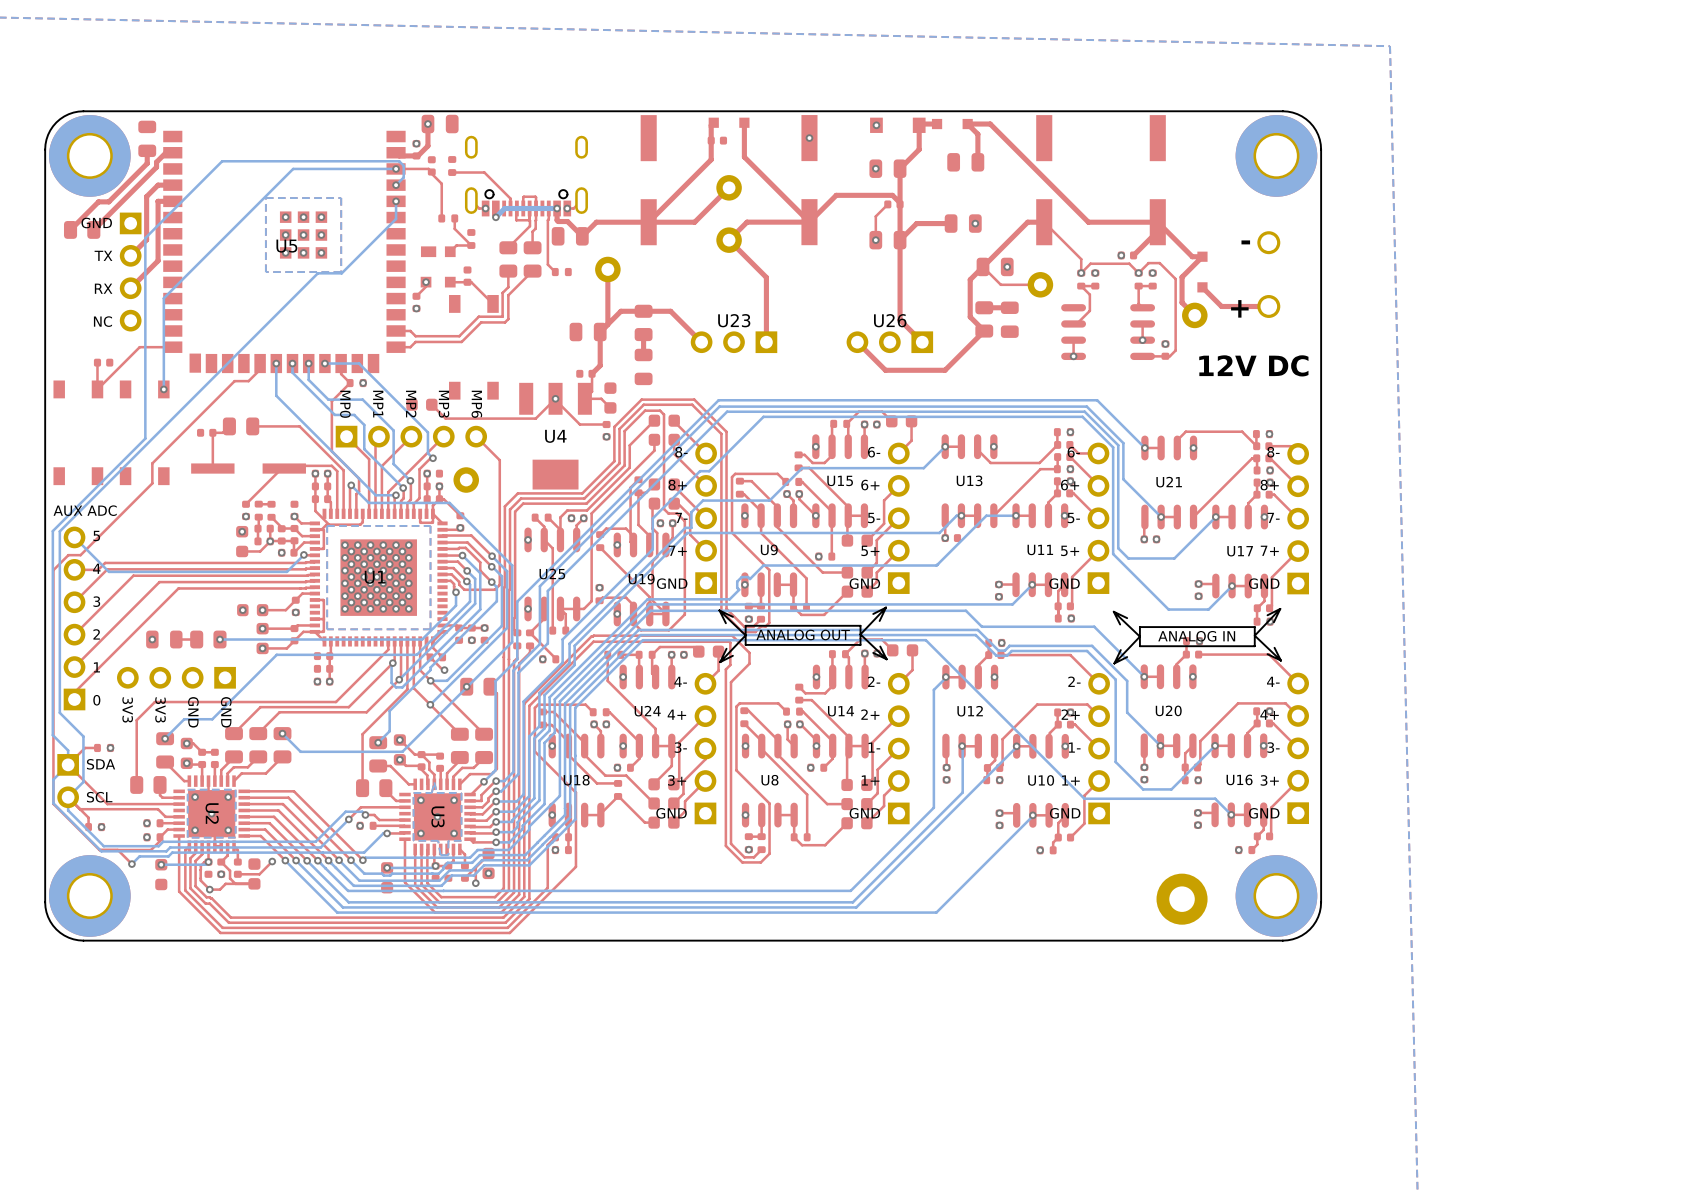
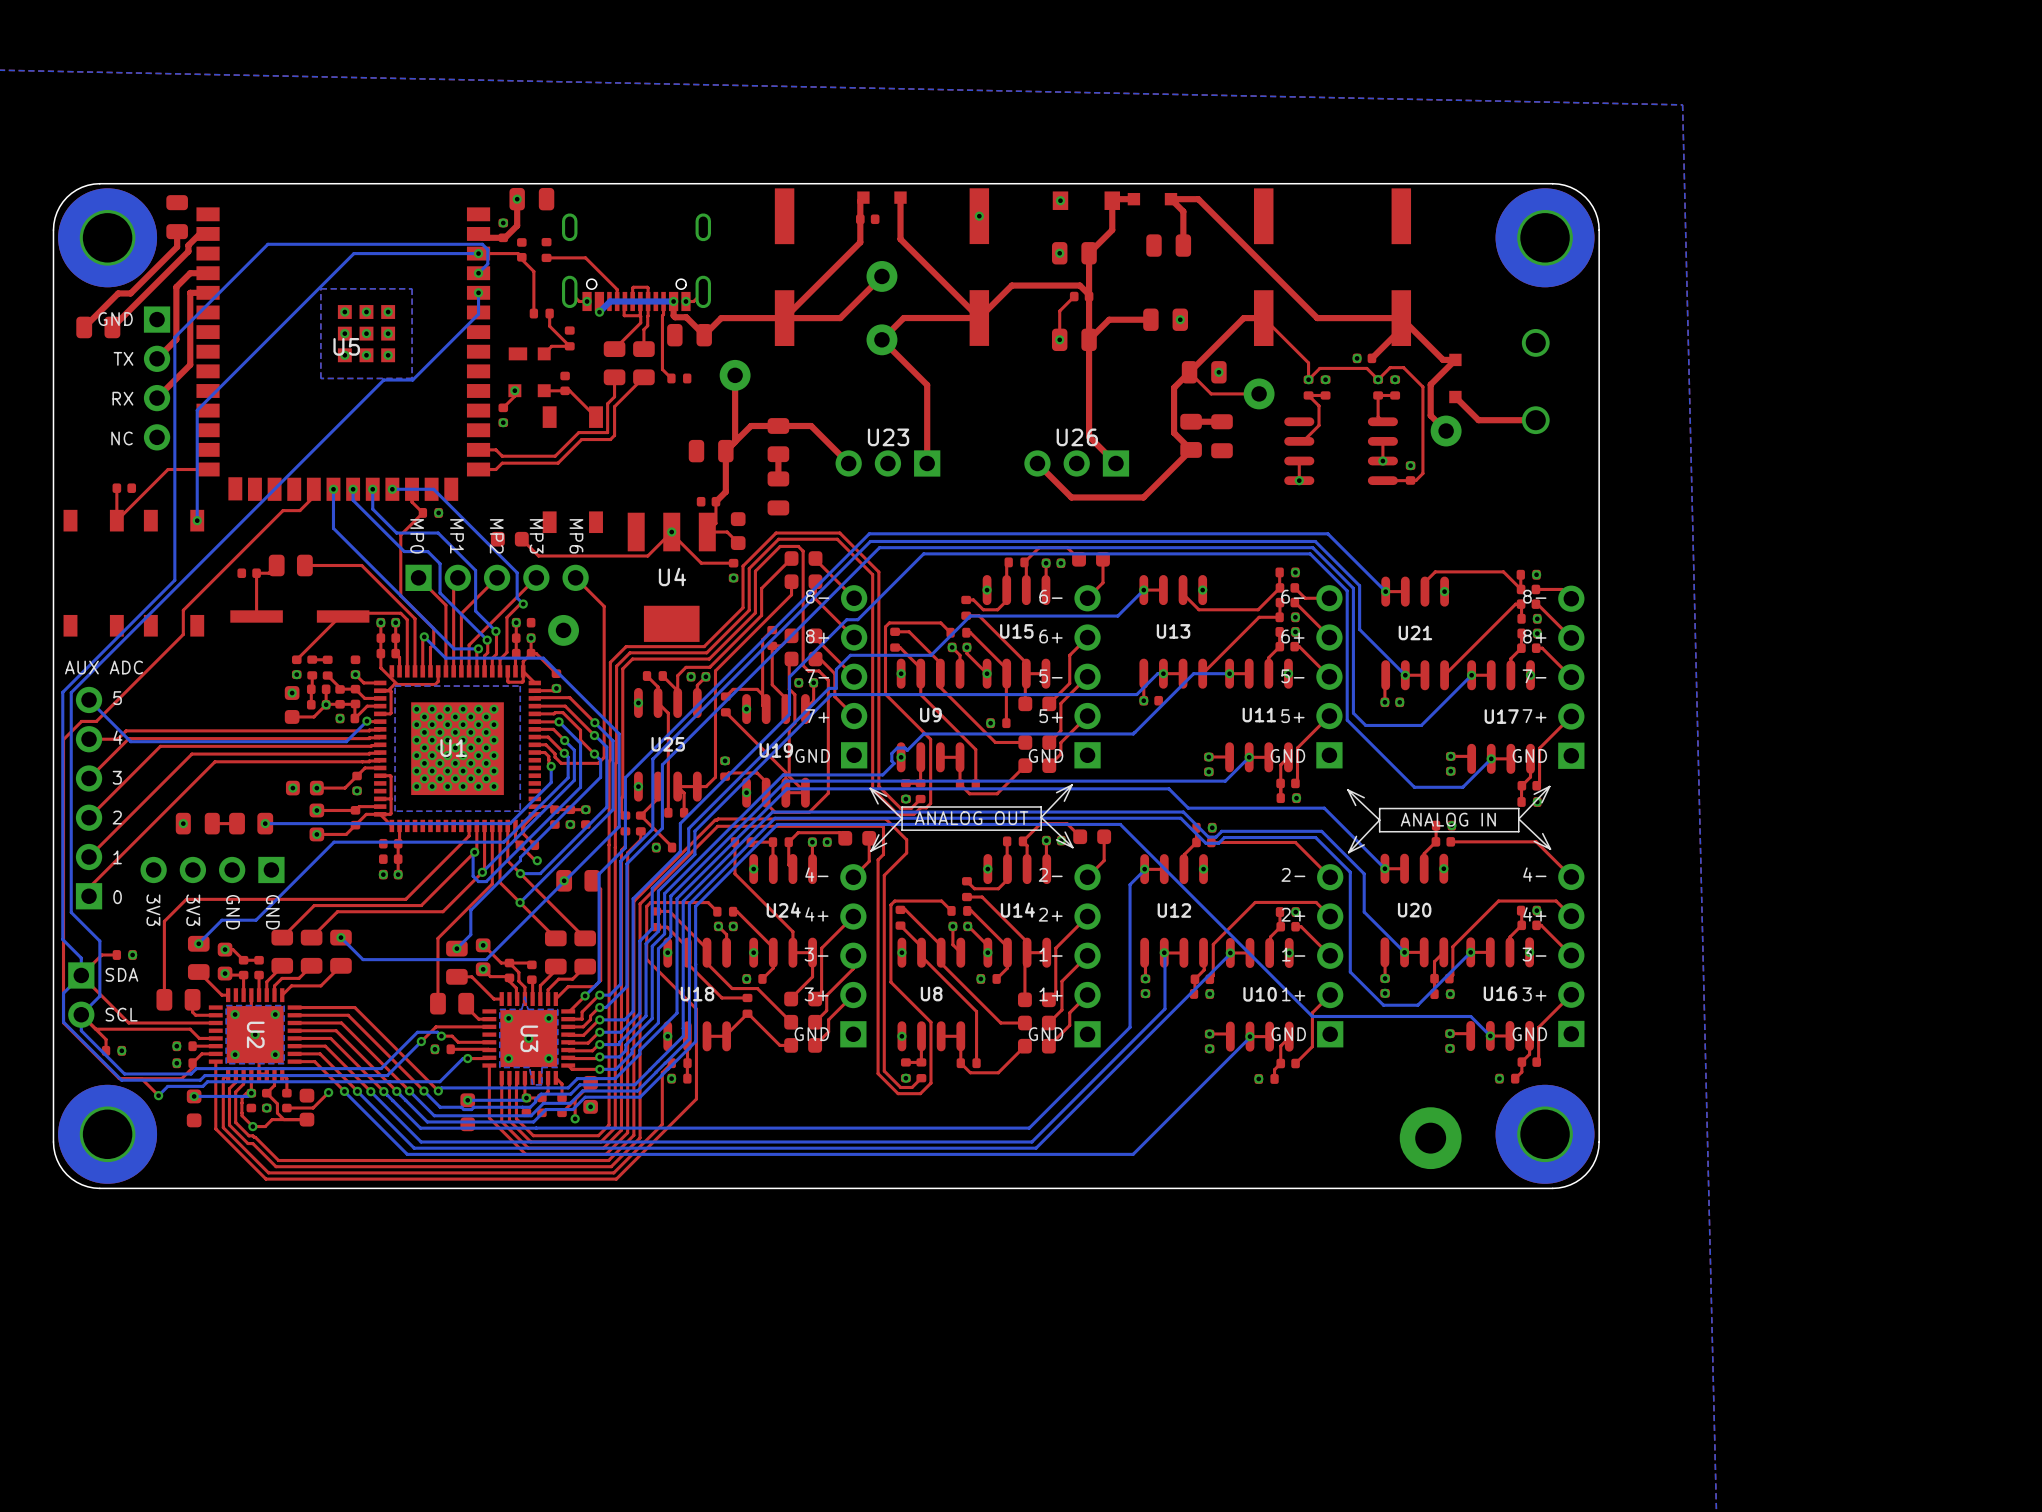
text: - (1245, 242) -> none
text: + (1239, 308) -> none
text: 12V DC (1253, 365) -> none

